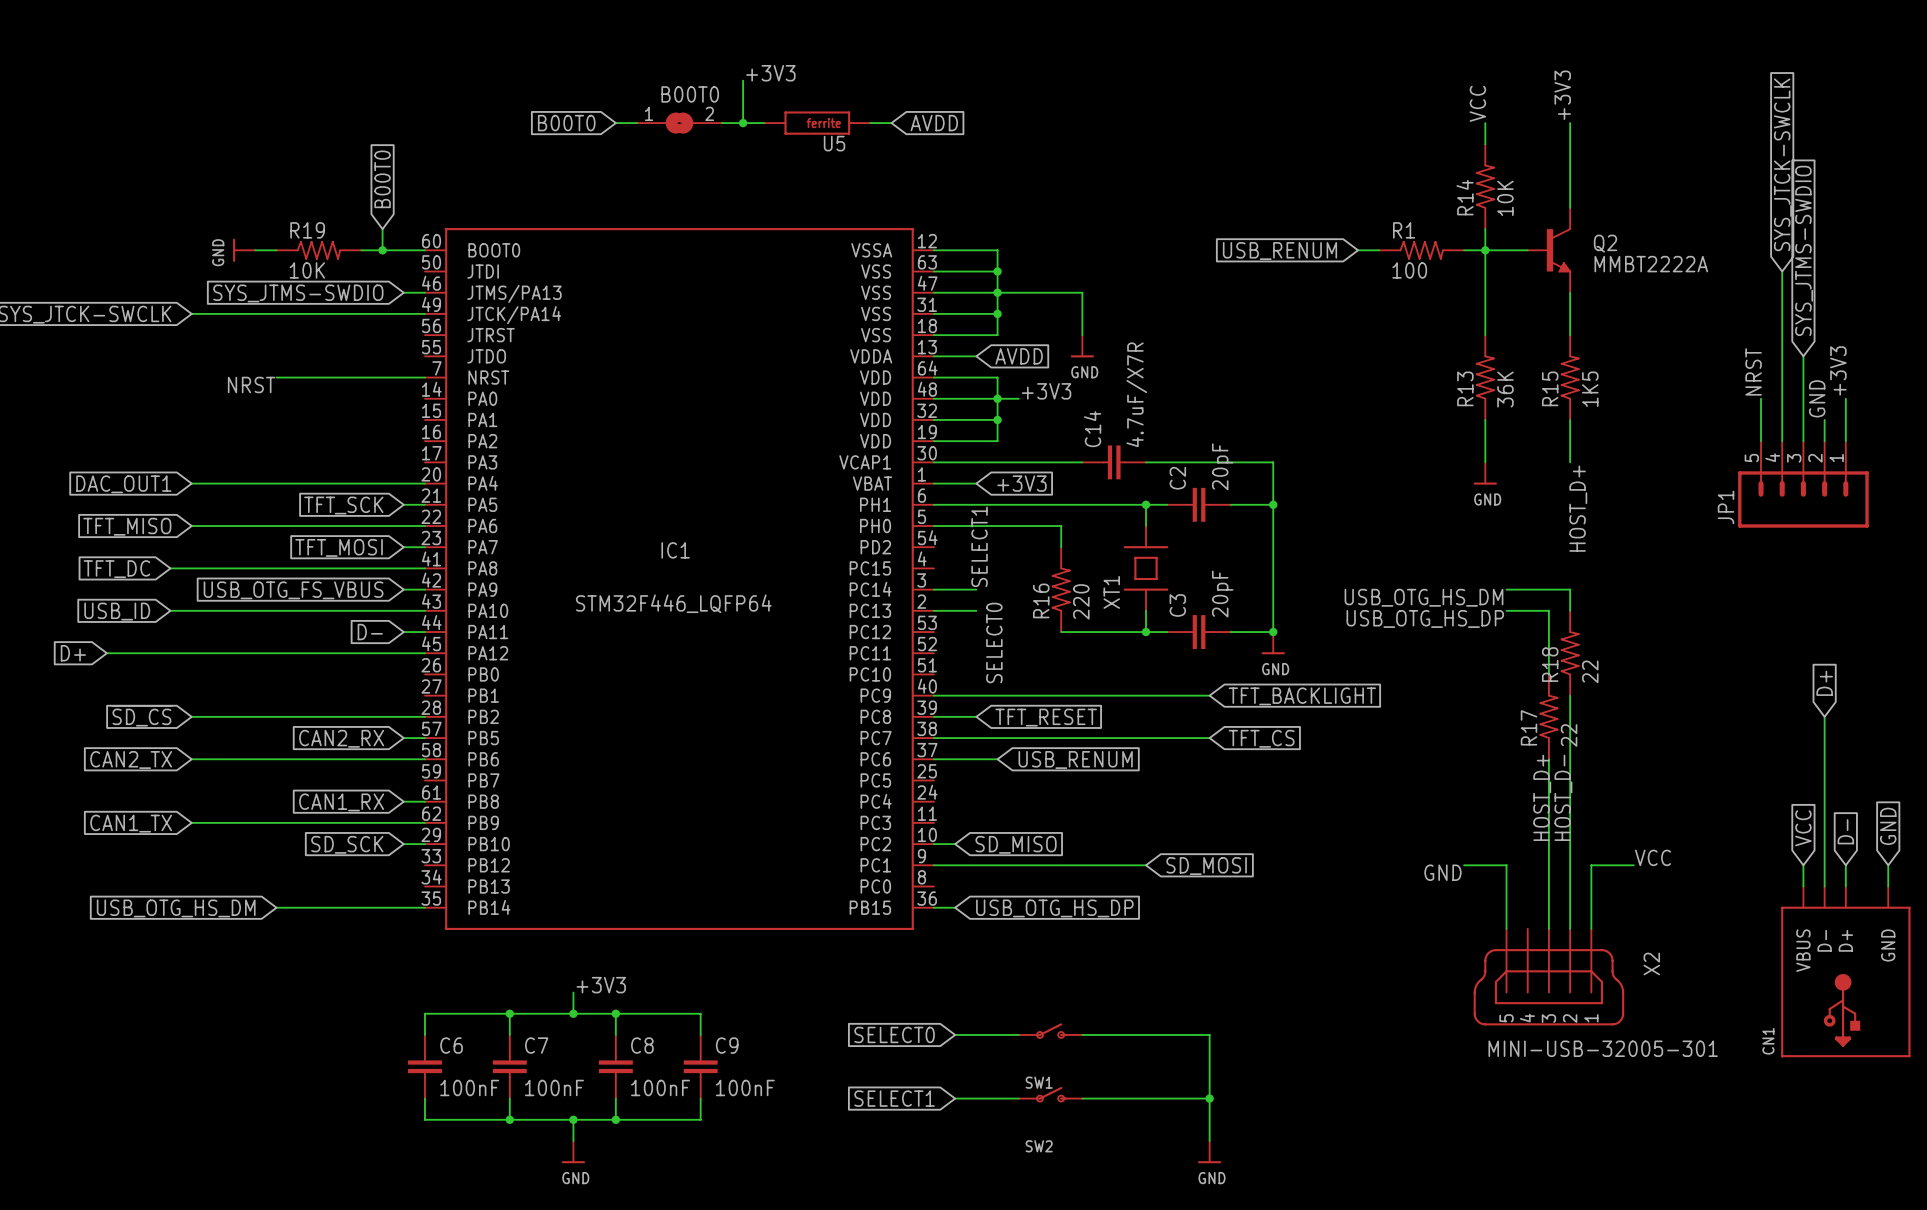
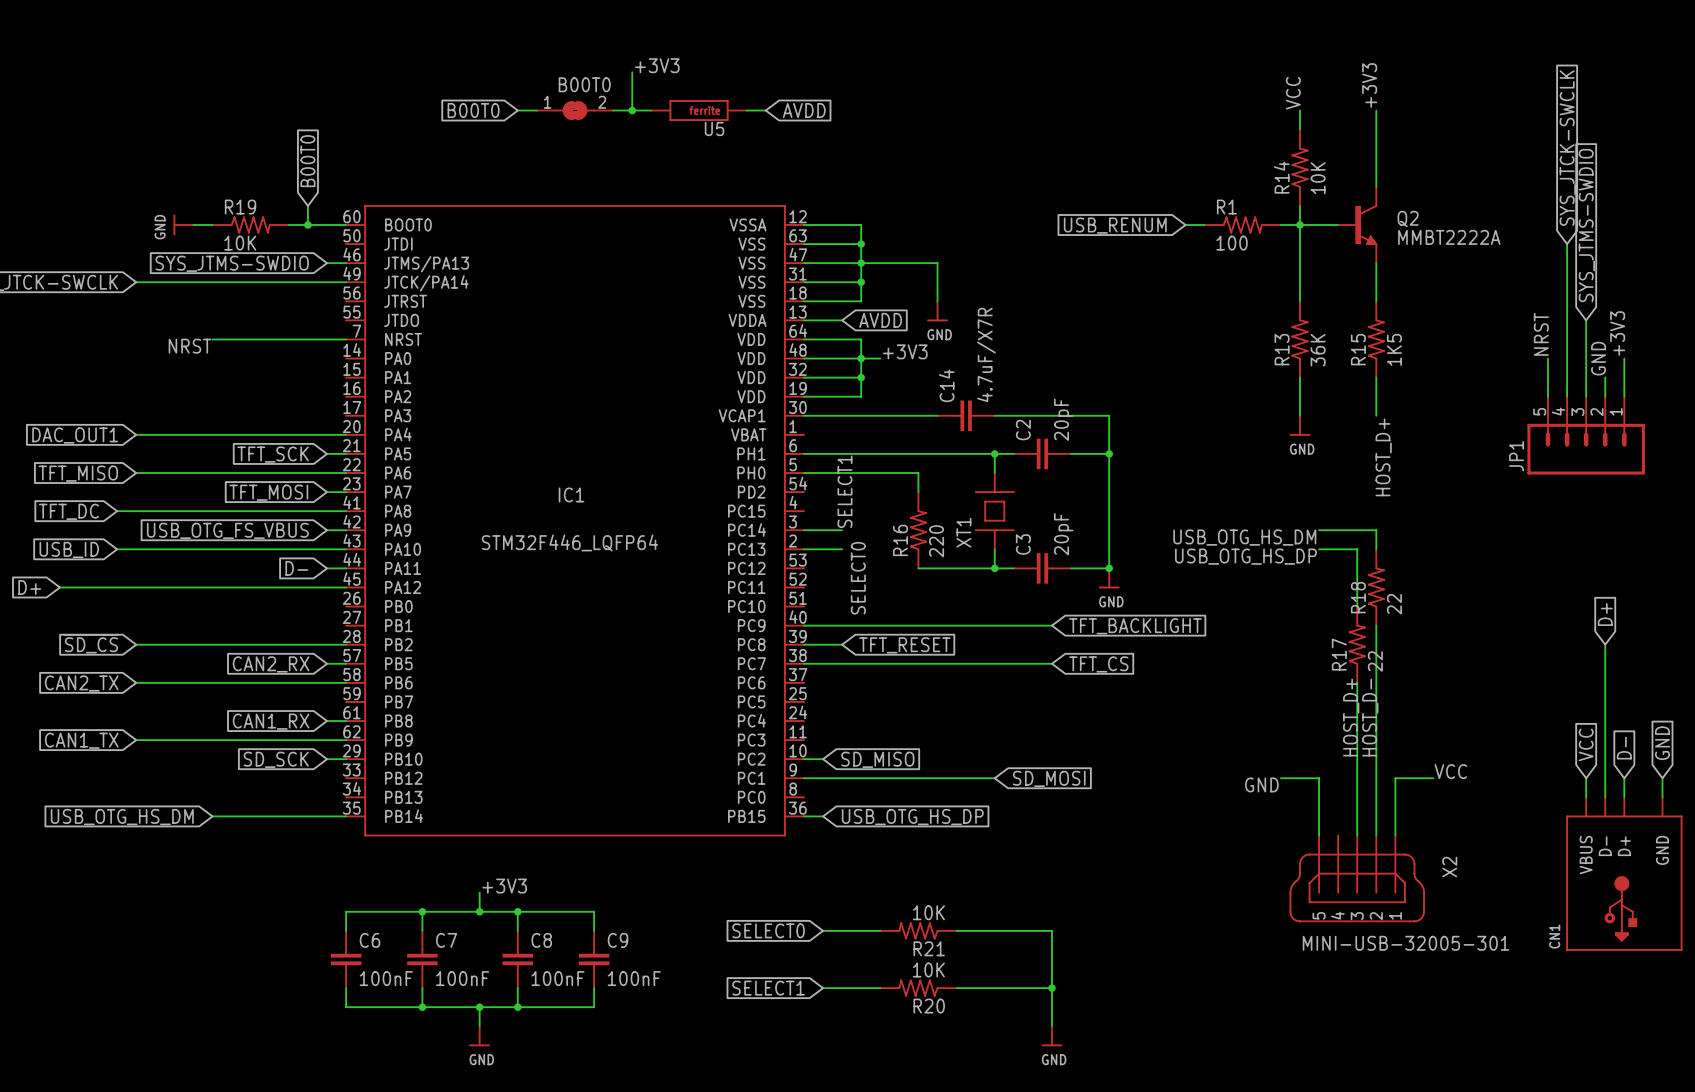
wire: (933, 483) (976, 483) -> none
global label: +3V3 (1021, 483) -> none
wire: (933, 759) (997, 759) -> none
global label: USB_RENUM (1075, 759) -> none
SW1: (1050, 1031) -> none
R21: none -> 10K (918, 930)
SW2: (1050, 1094) -> none
R20: none -> 10K (918, 988)

